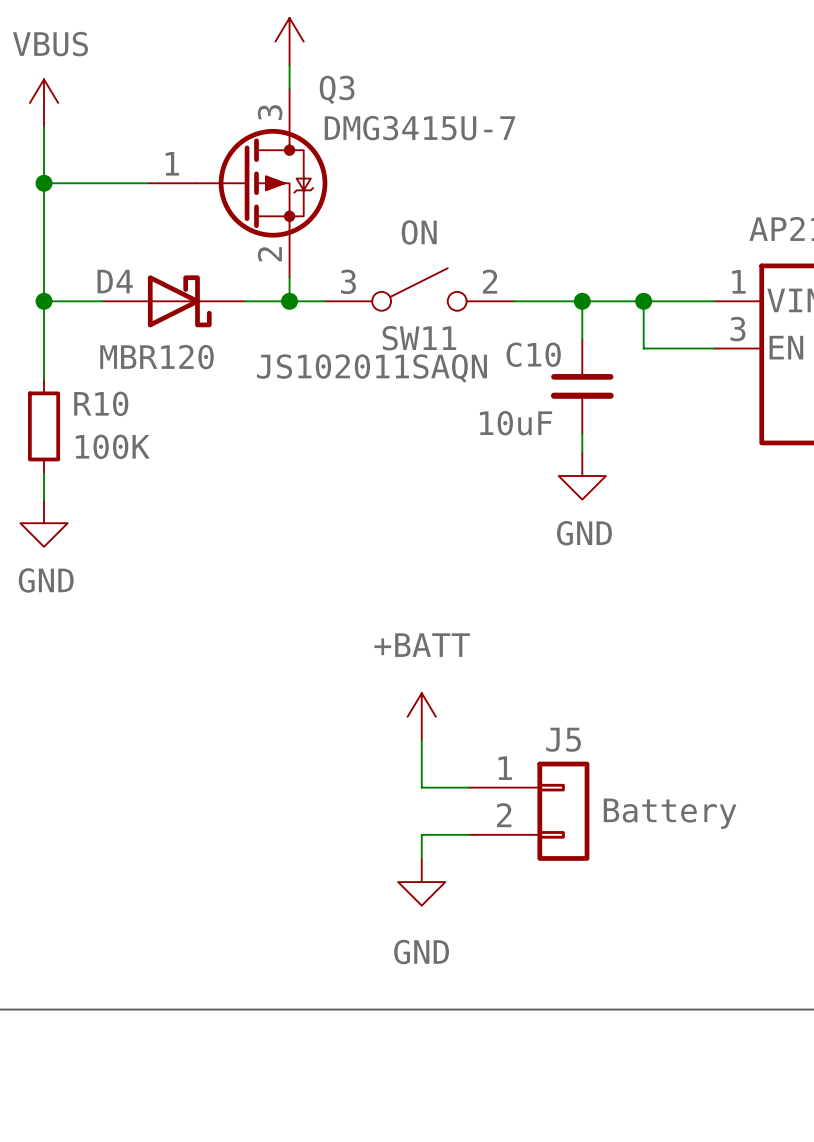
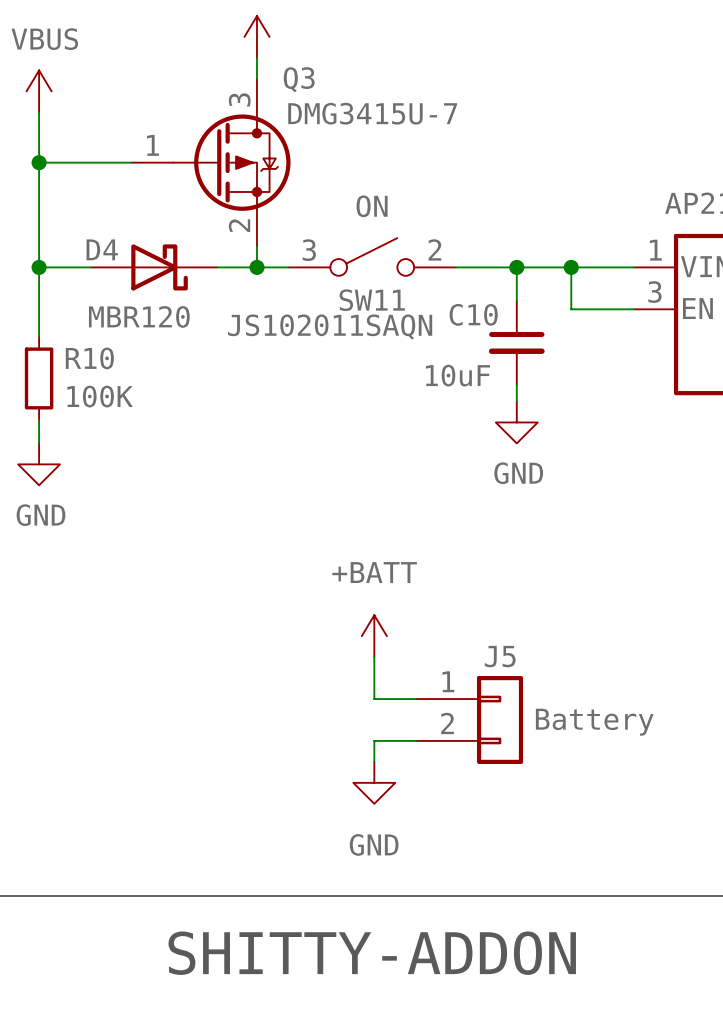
text: none -> SHITTY-ADDON (372, 953)

